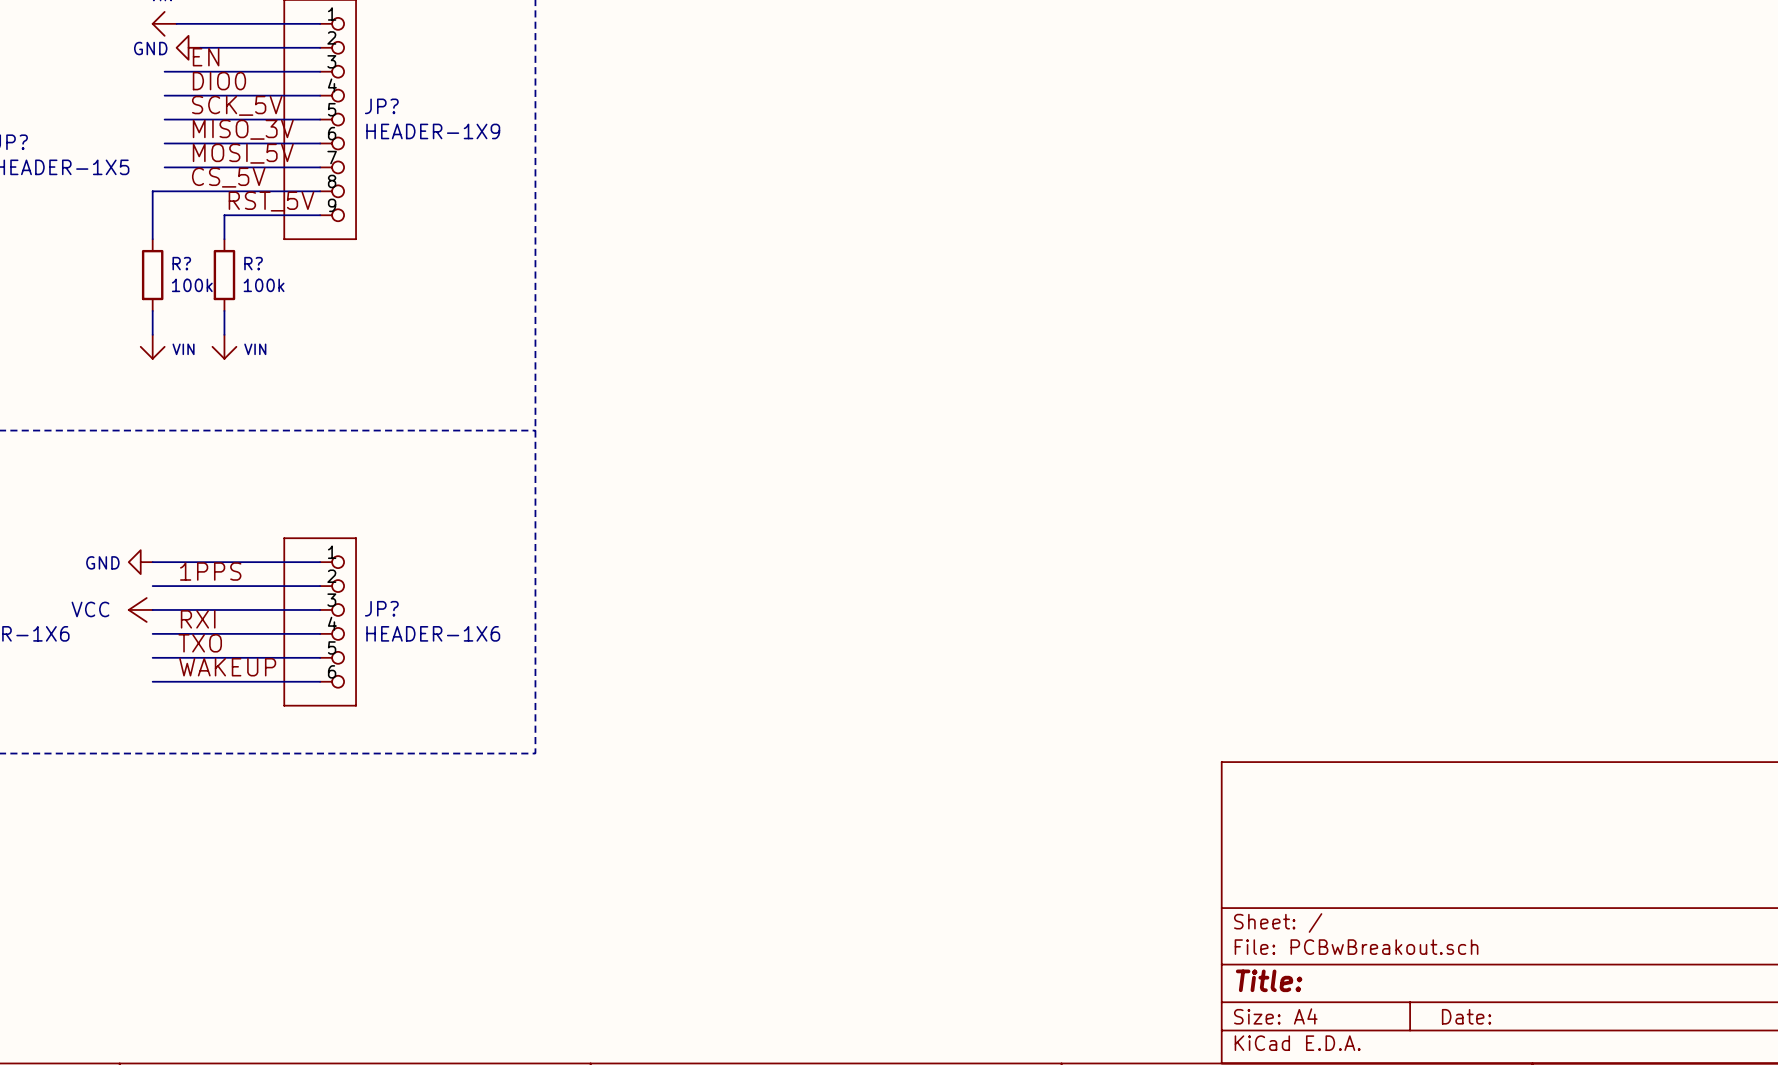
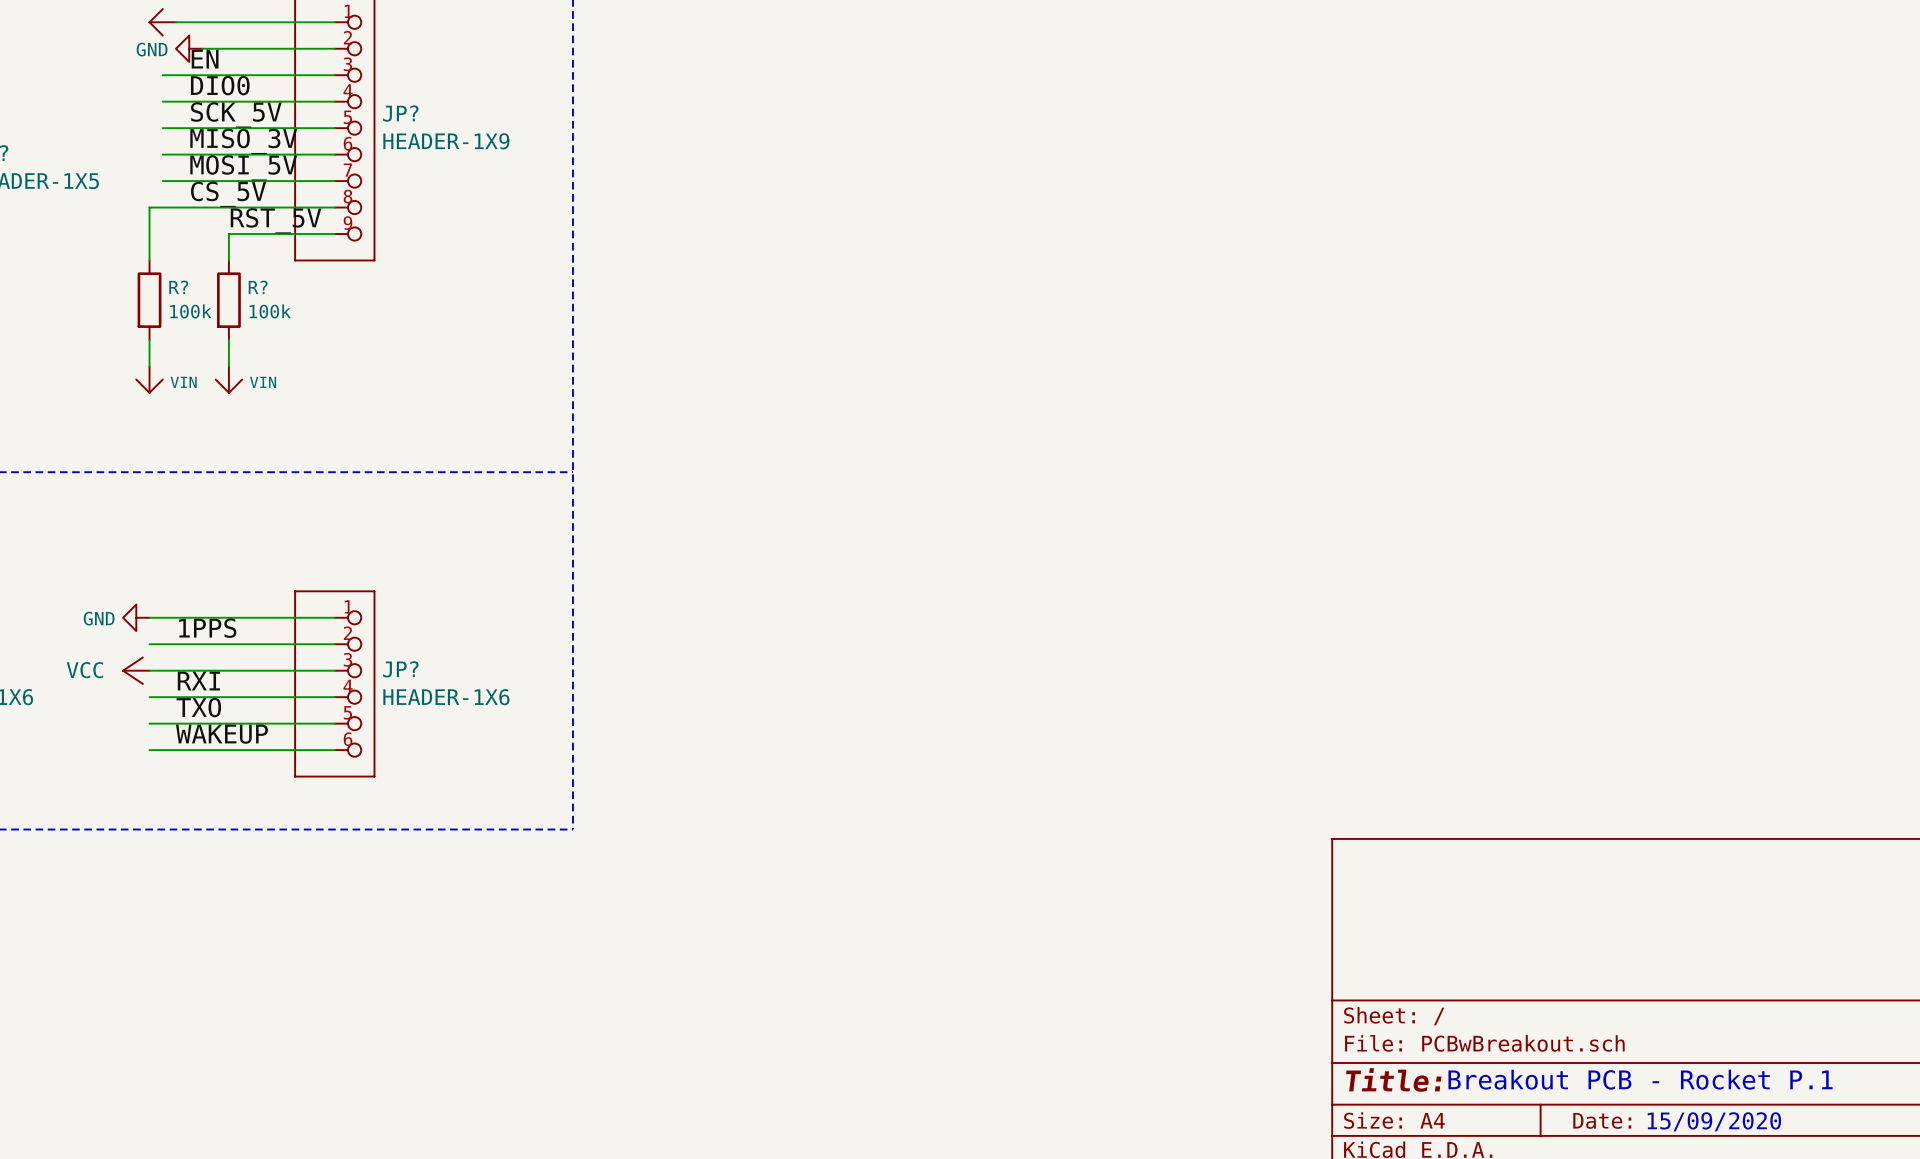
text: none -> Breakout PCB - Rocket P.1 (1640, 1079)
text: none -> 15/09/2020 (1714, 1121)

